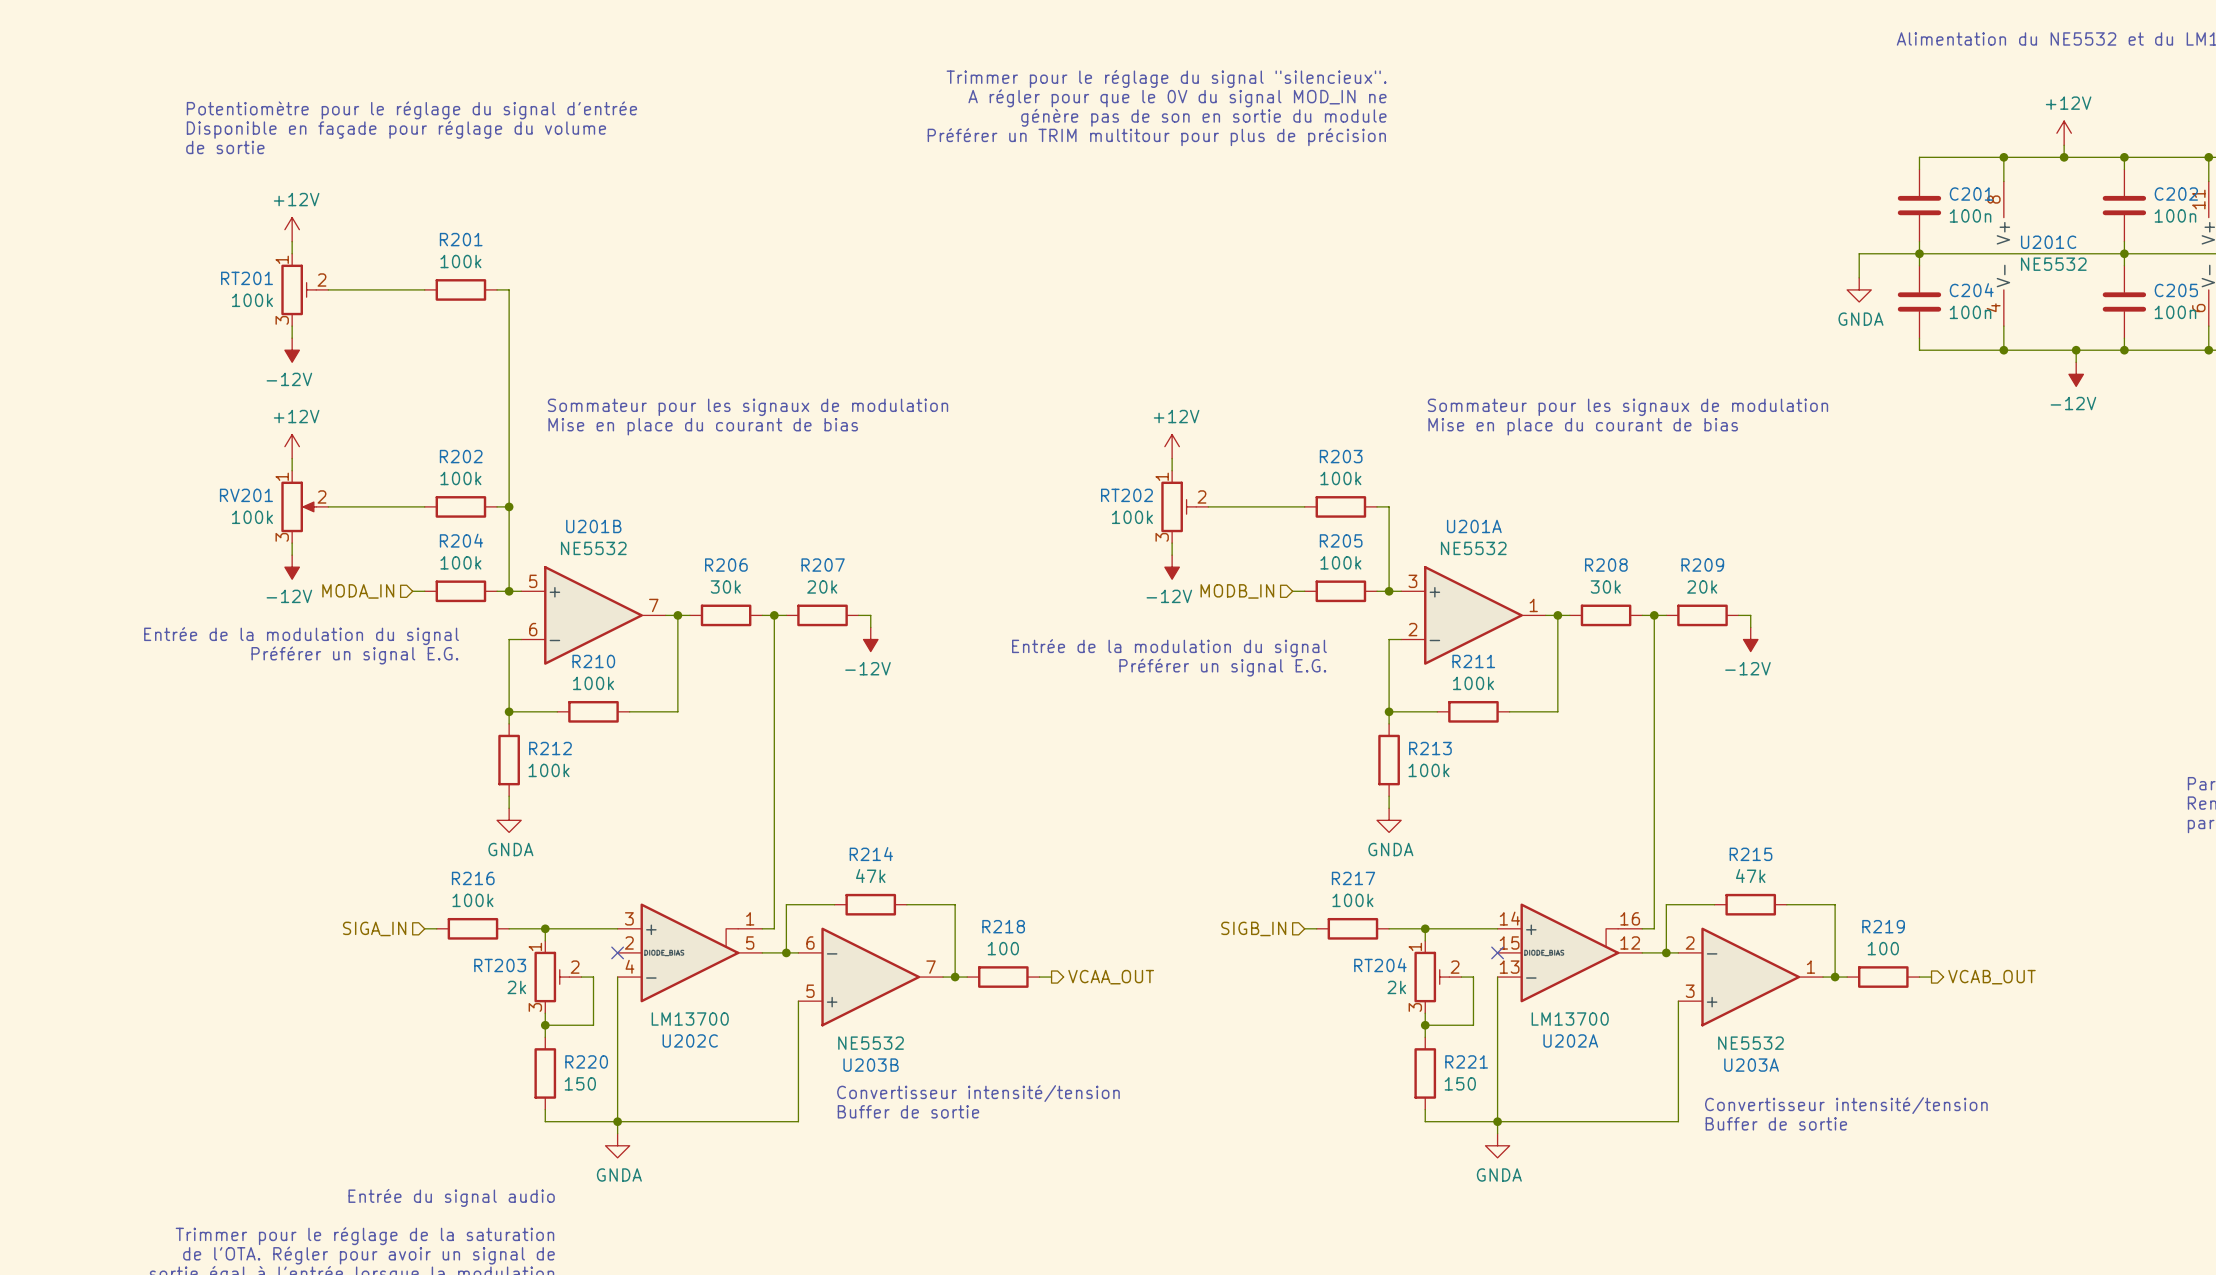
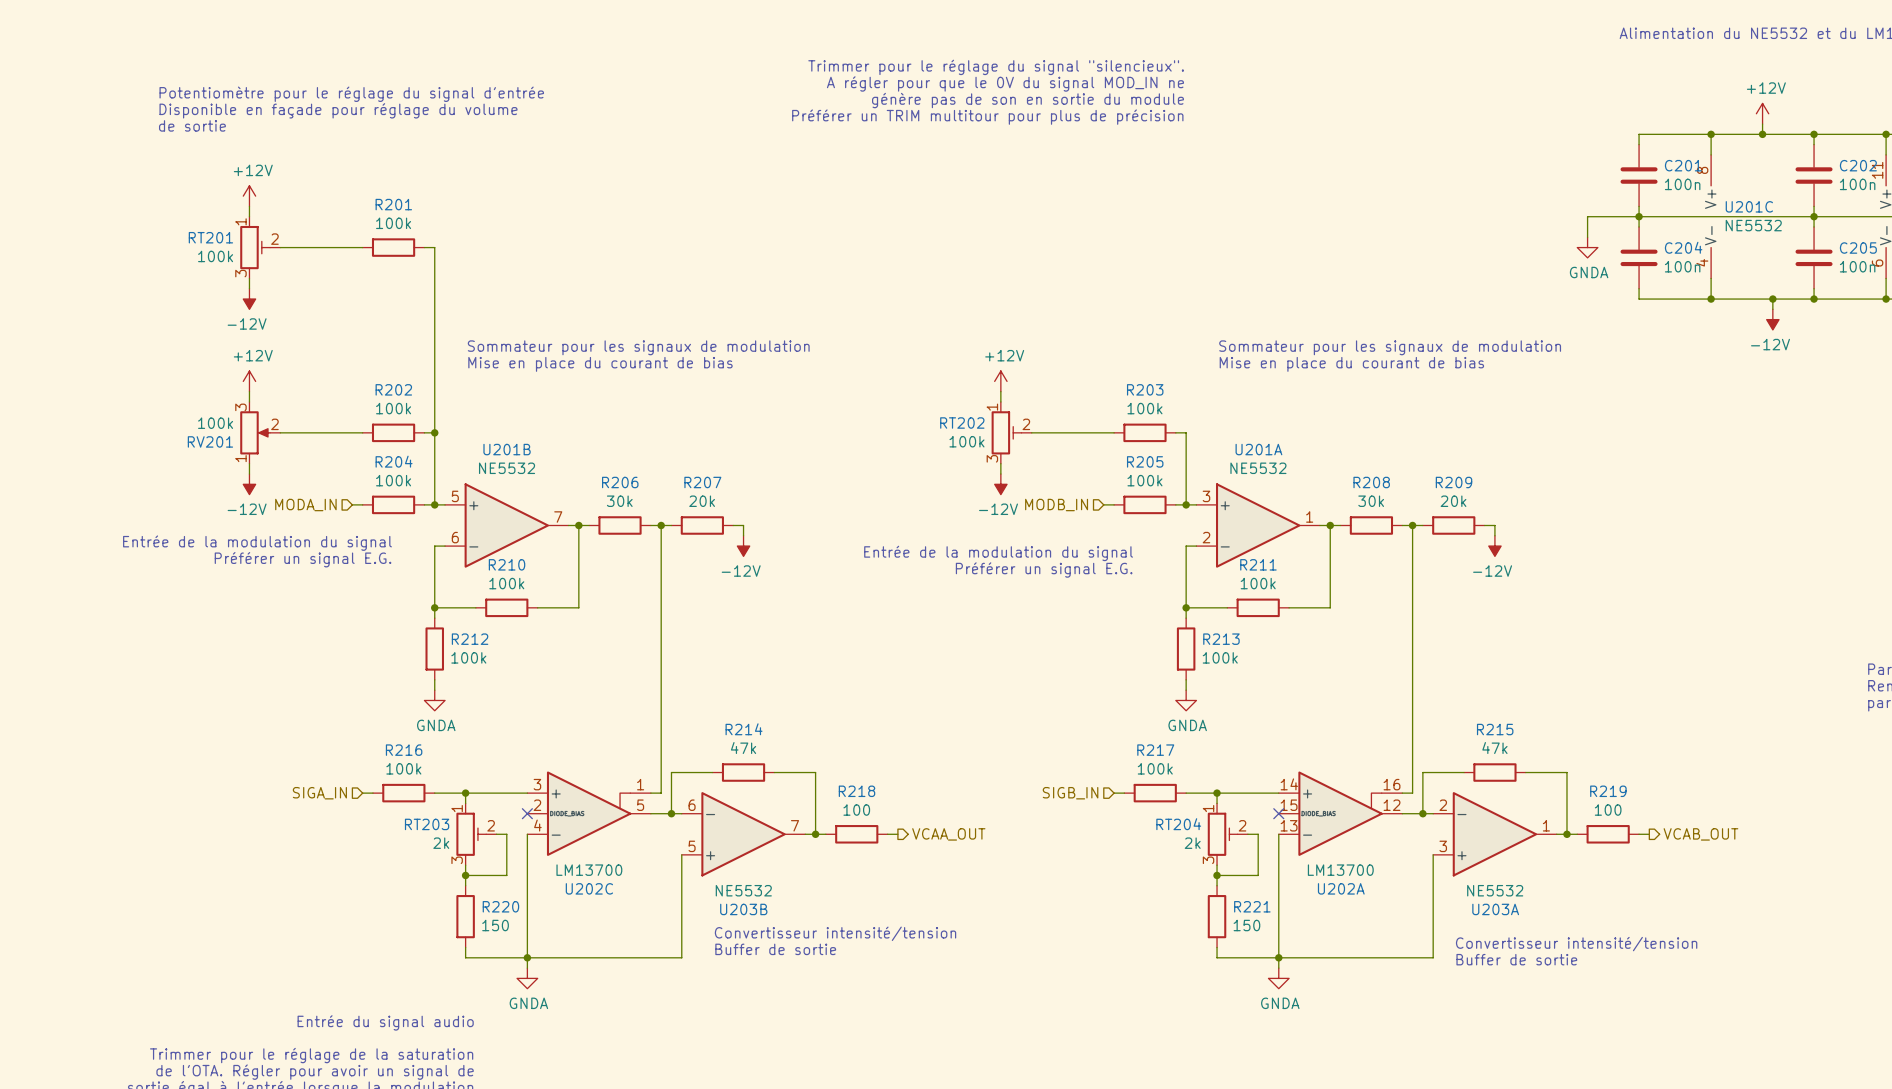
RV201 flip: as is (298, 506) -> up-down (255, 432)

